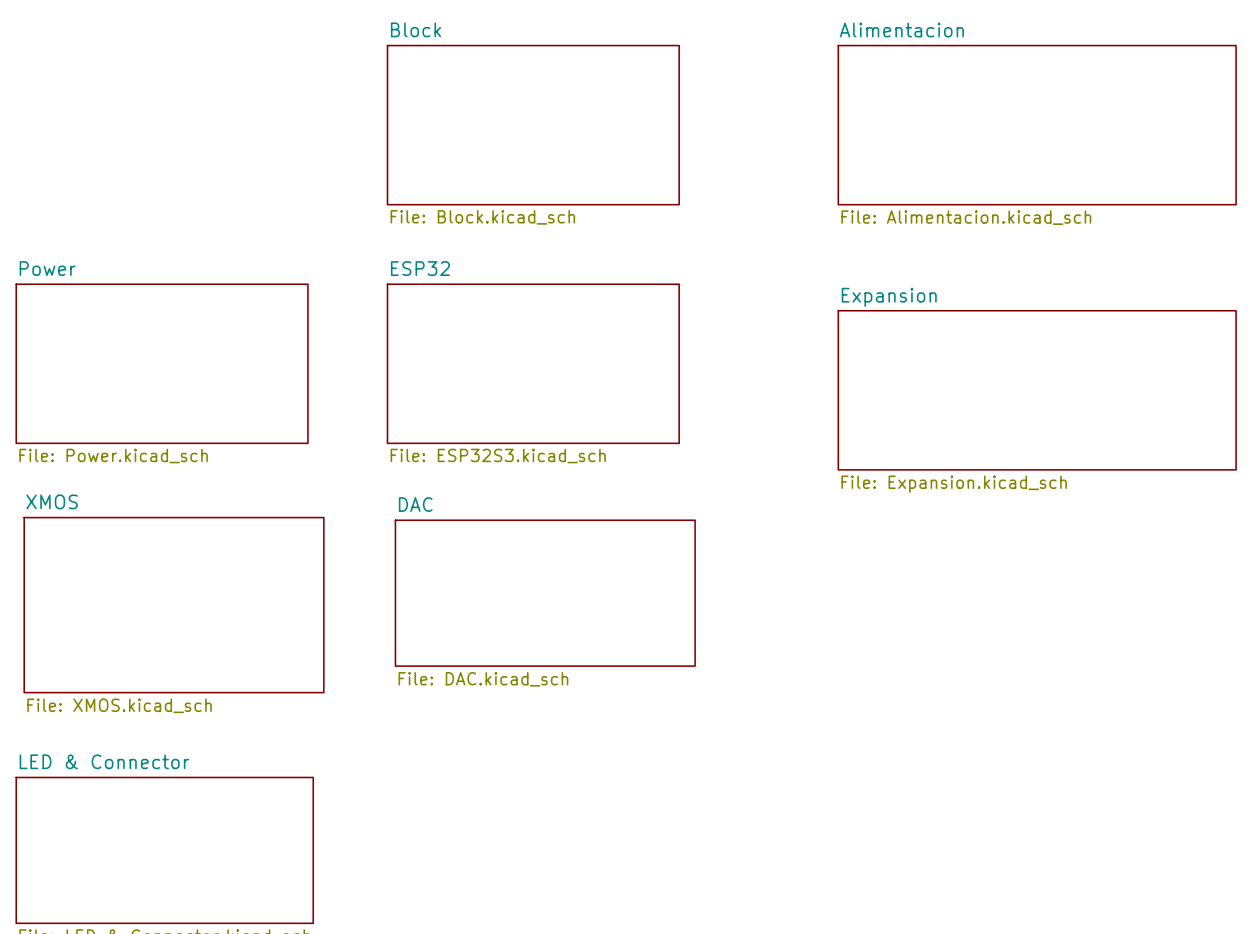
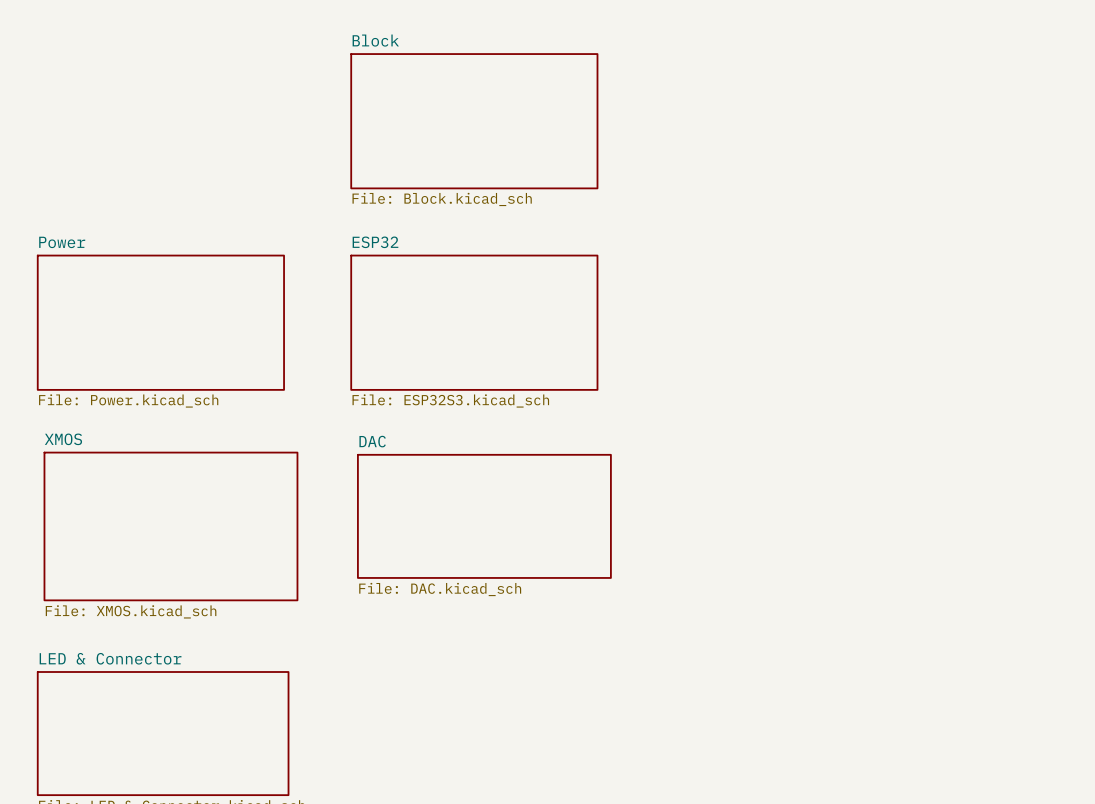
sheet Alimentacion: File: Alimentacion.kicad_sch (1037, 125) -> none
sheet Expansion: File: Expansion.kicad_sch (1037, 390) -> none

